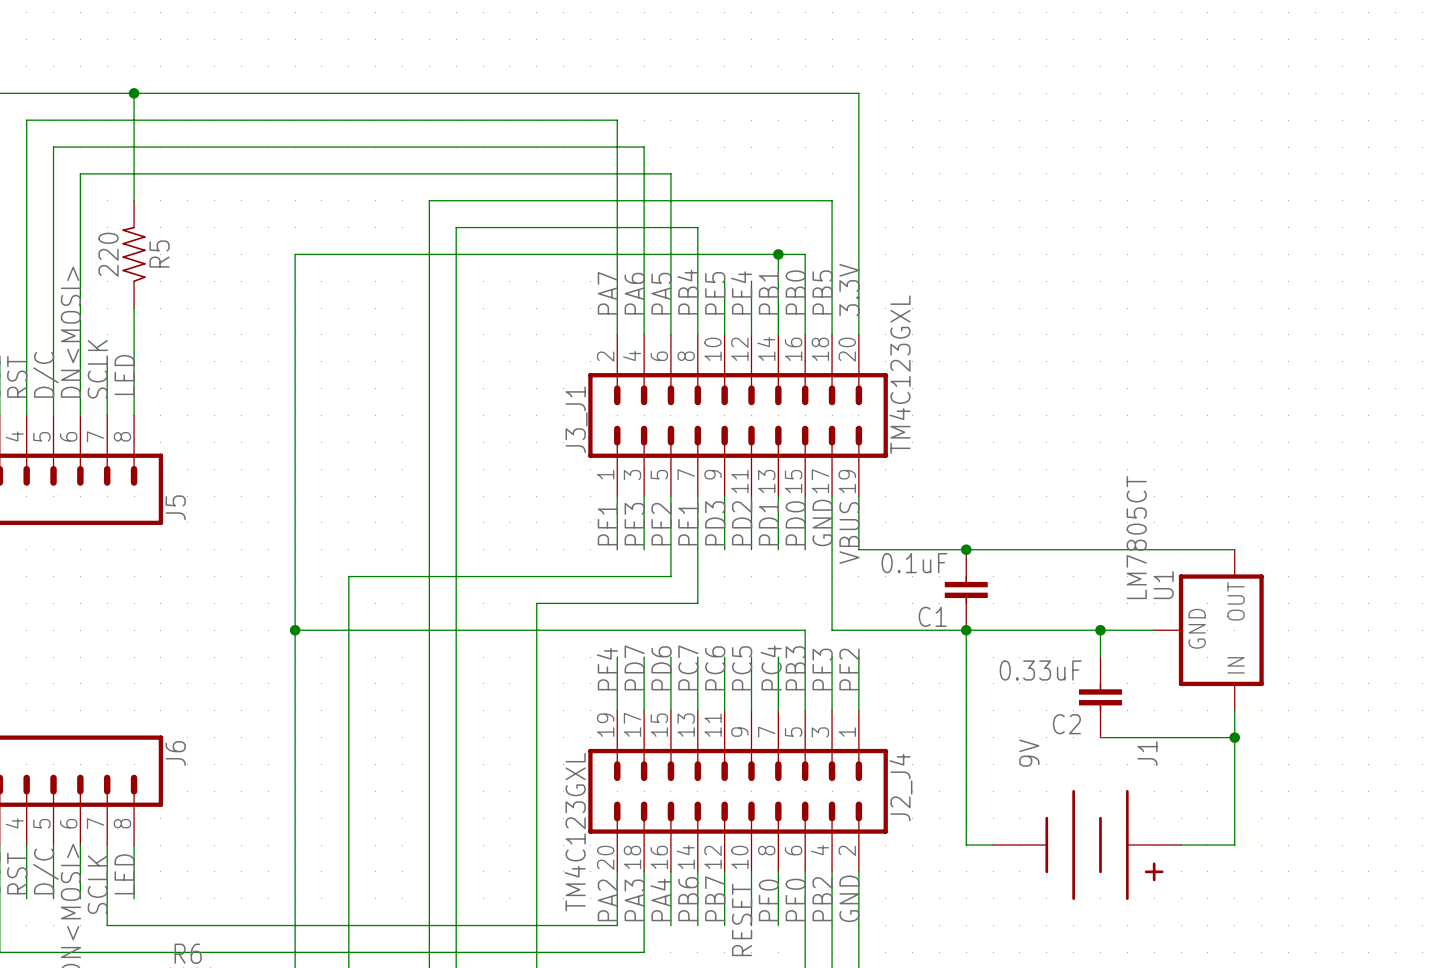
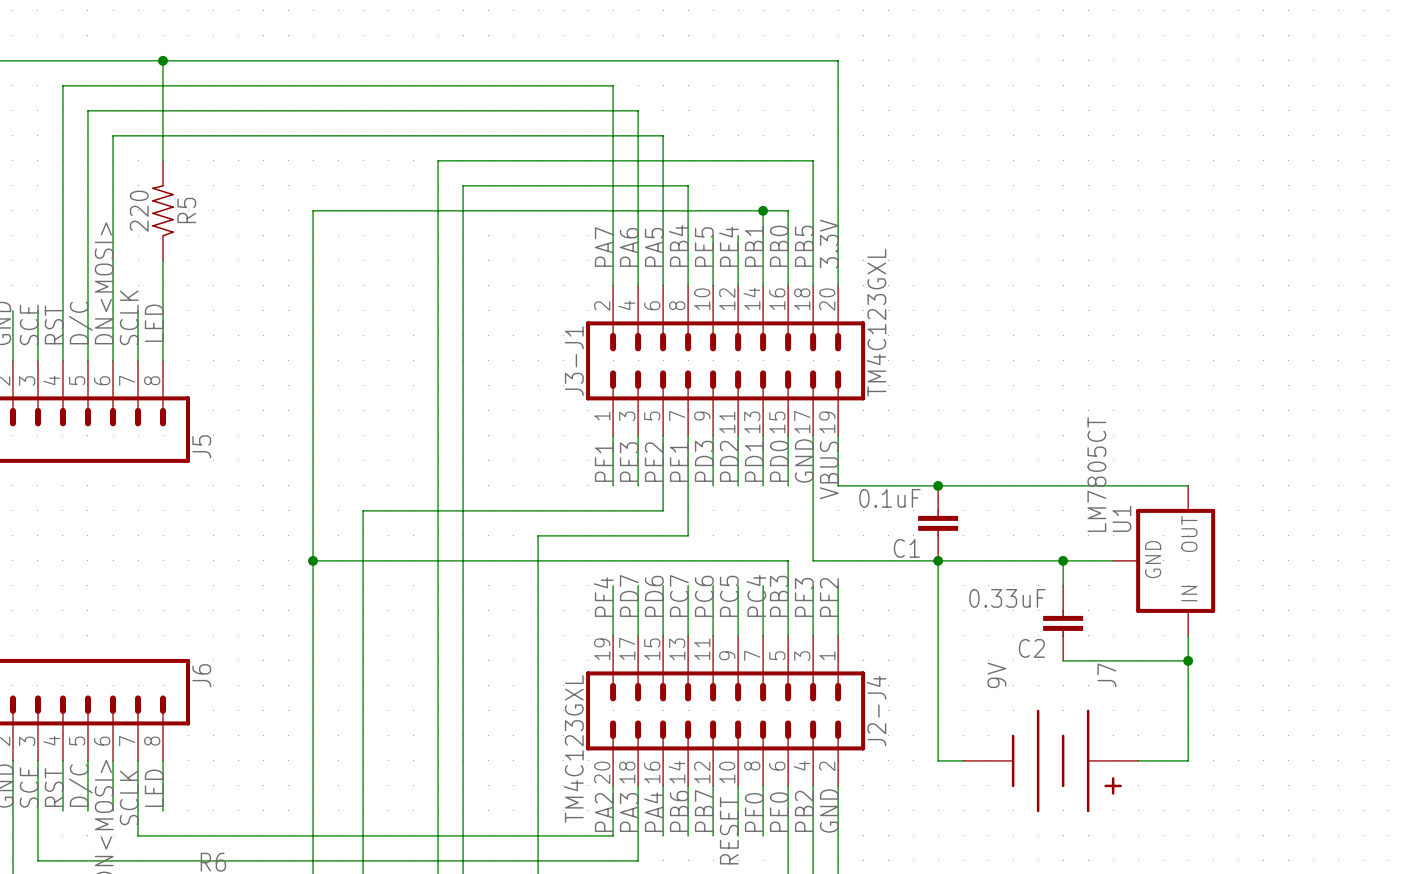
J3_J1 name: J3_J1 (576, 419) -> J3-J1 (574, 361)
J1 name: J1 (1147, 753) -> J7 (1106, 675)
J2_J4 name: J2_J4 (900, 787) -> J2-J4 (876, 711)

